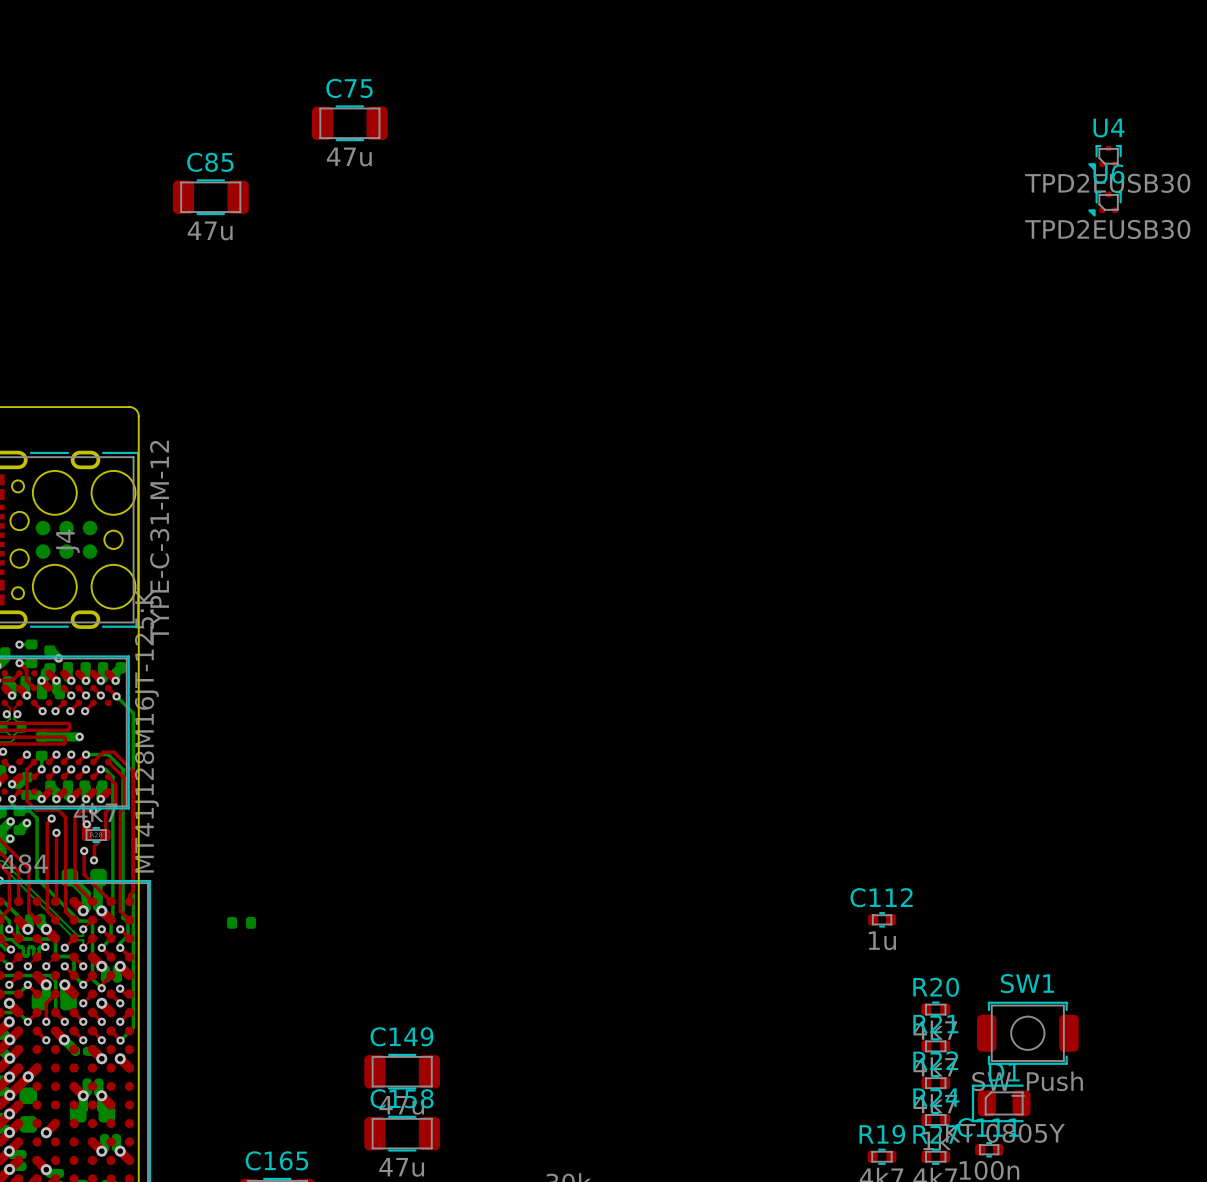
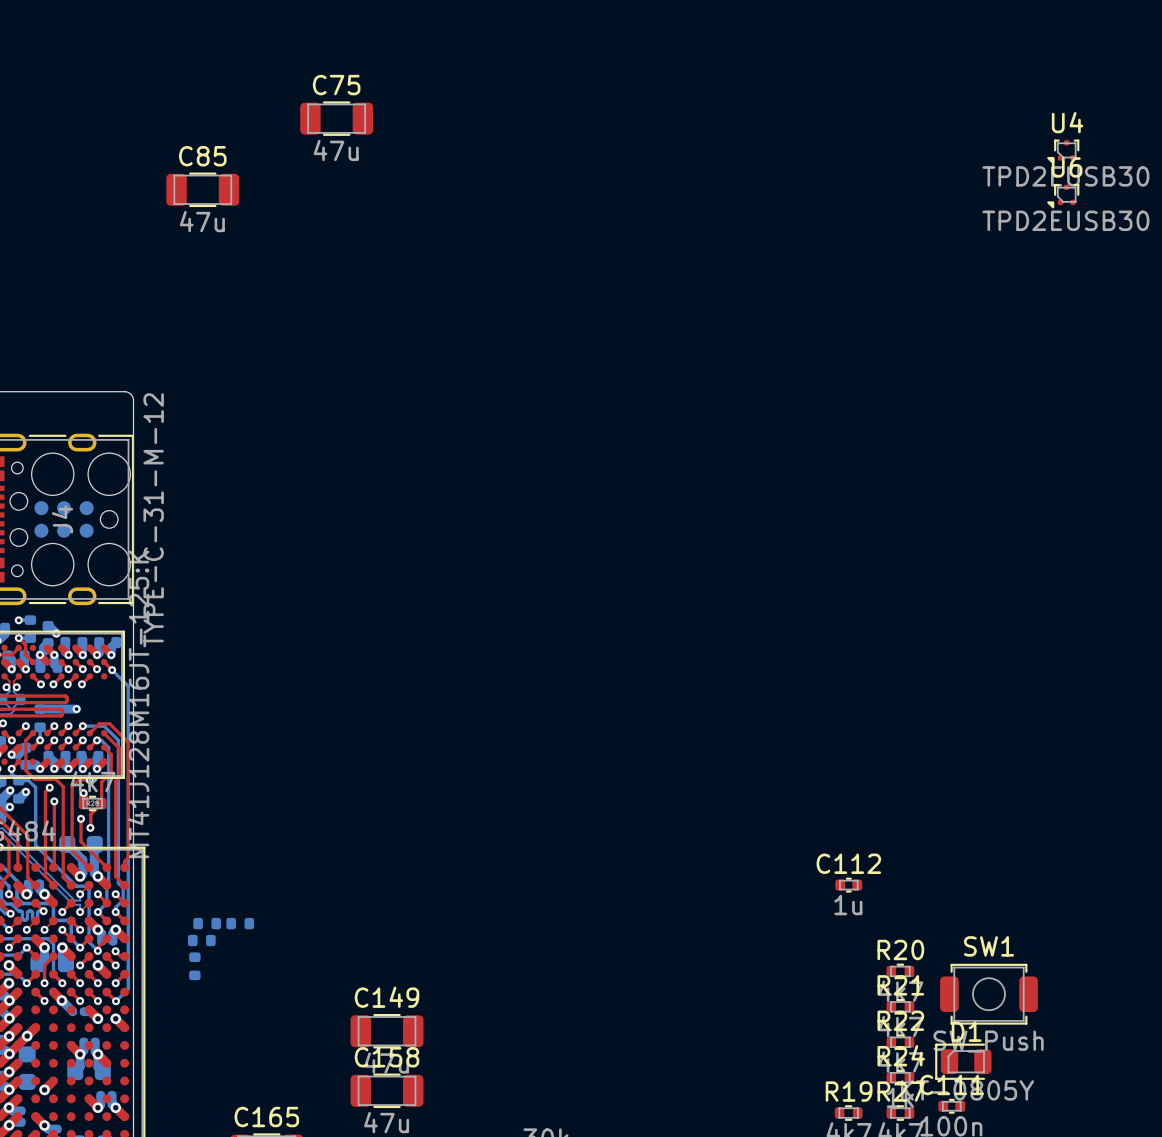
part: (241, 922) -> none
part: none -> (207, 923)
part: none -> (240, 923)
part: none -> (201, 940)
part: none -> (194, 966)

